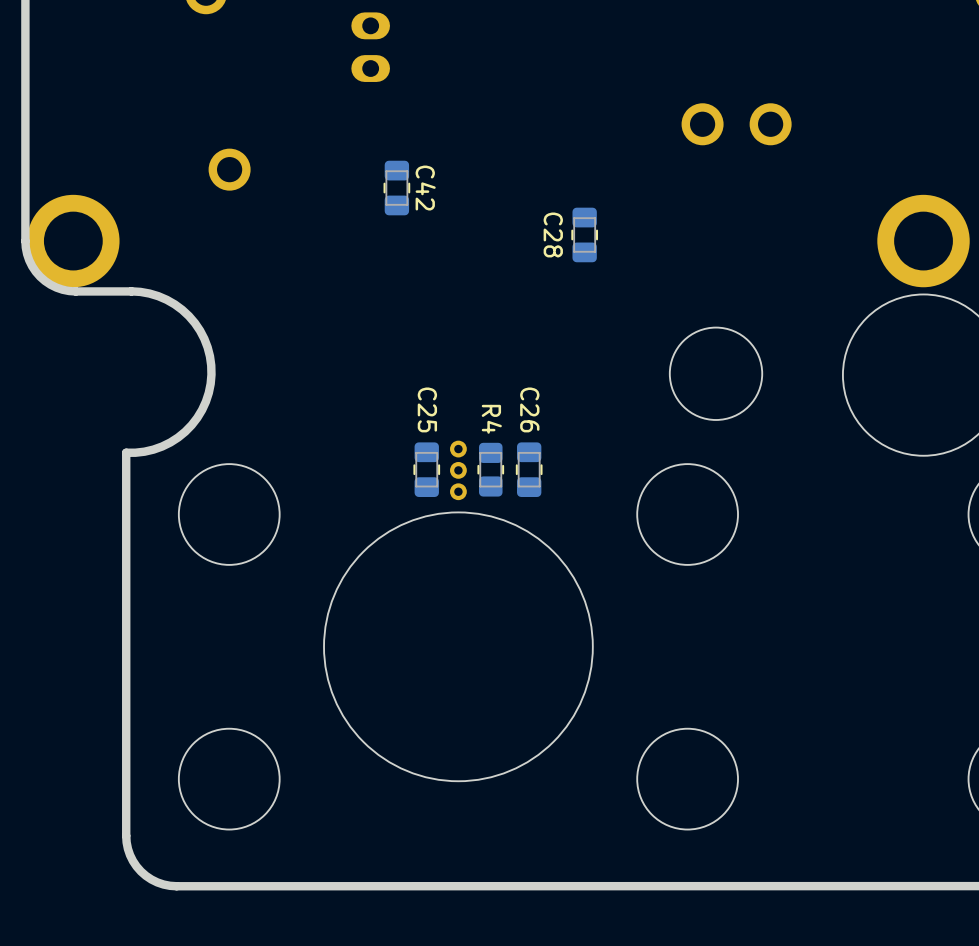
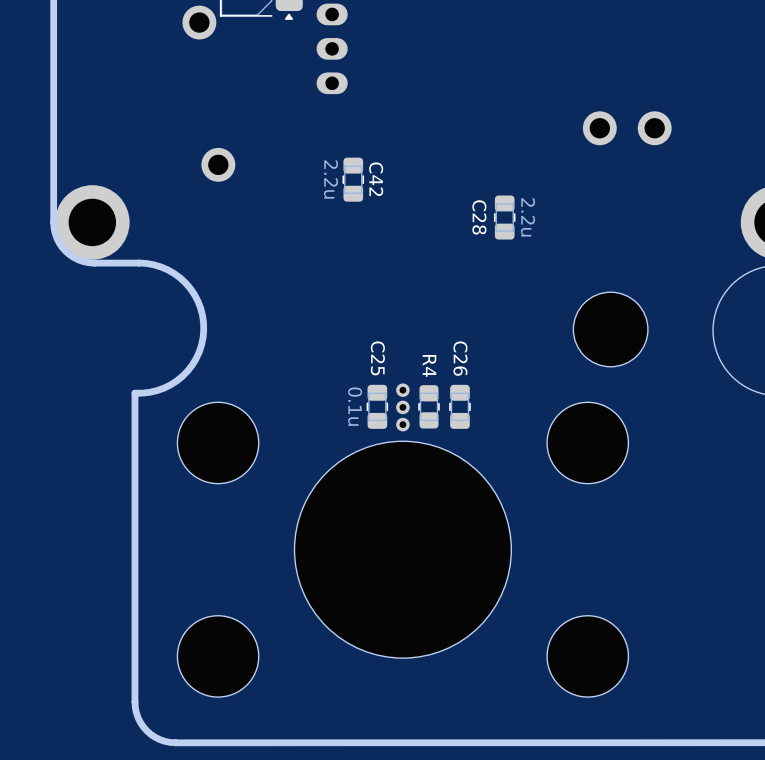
C42 value: none -> 2.2u (331, 179)
C28 value: none -> 2.2u (527, 217)
C25 value: none -> 0.1u (355, 406)

